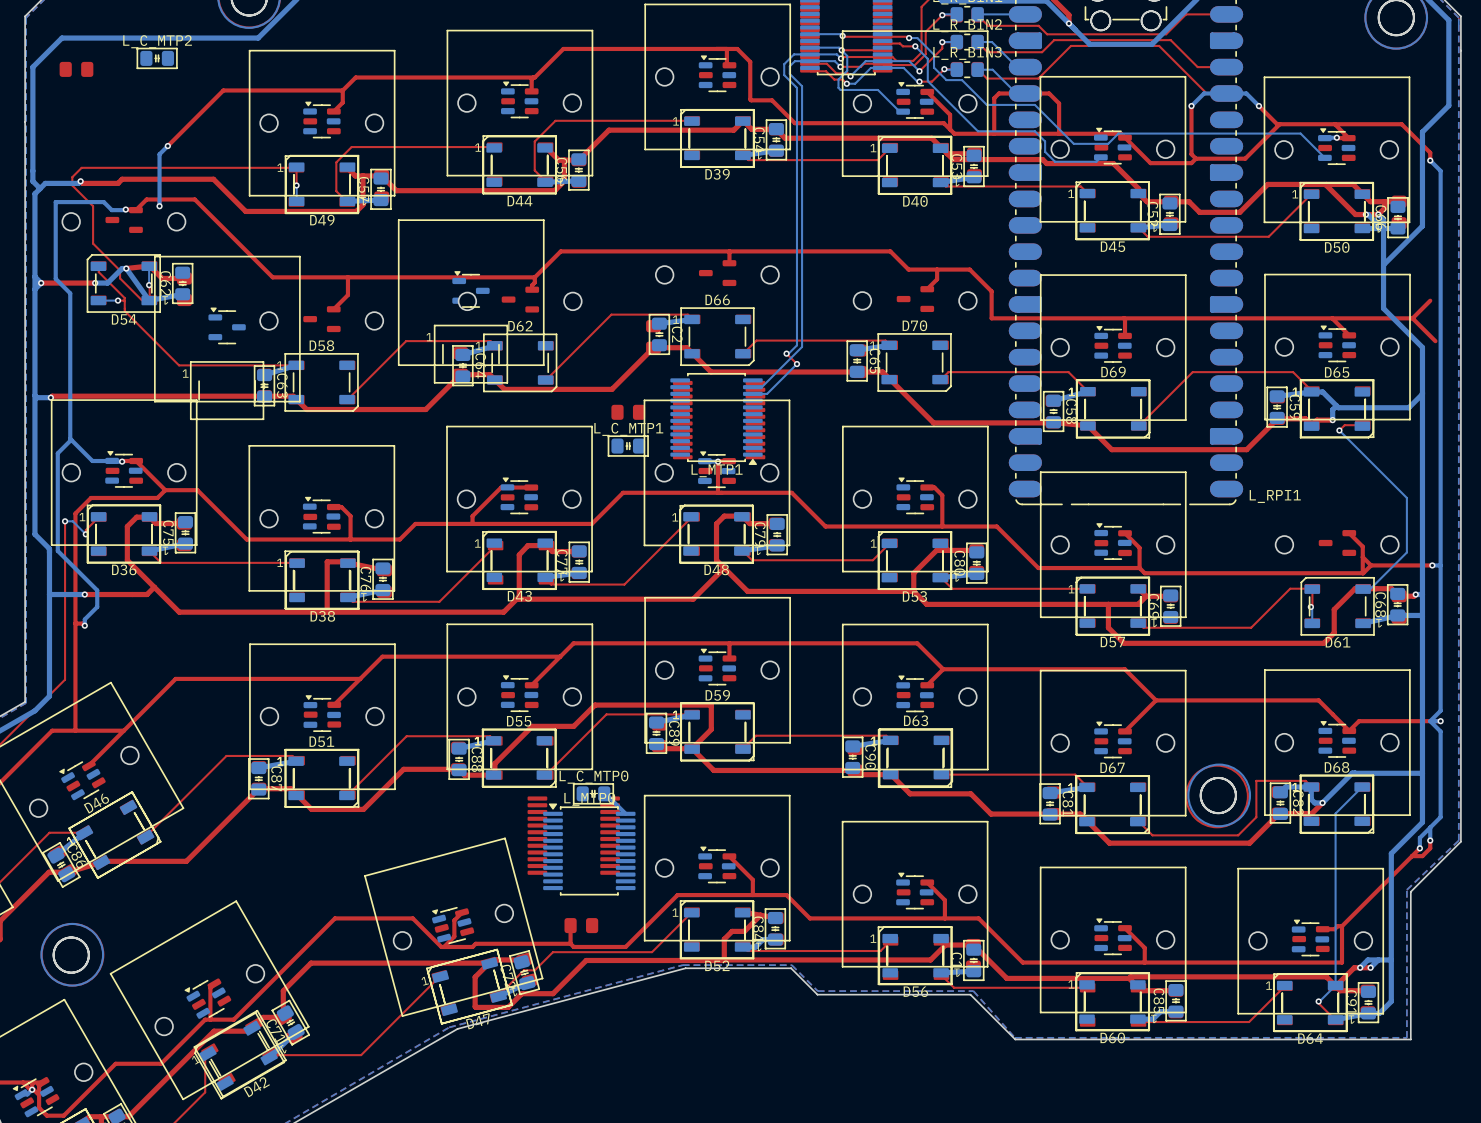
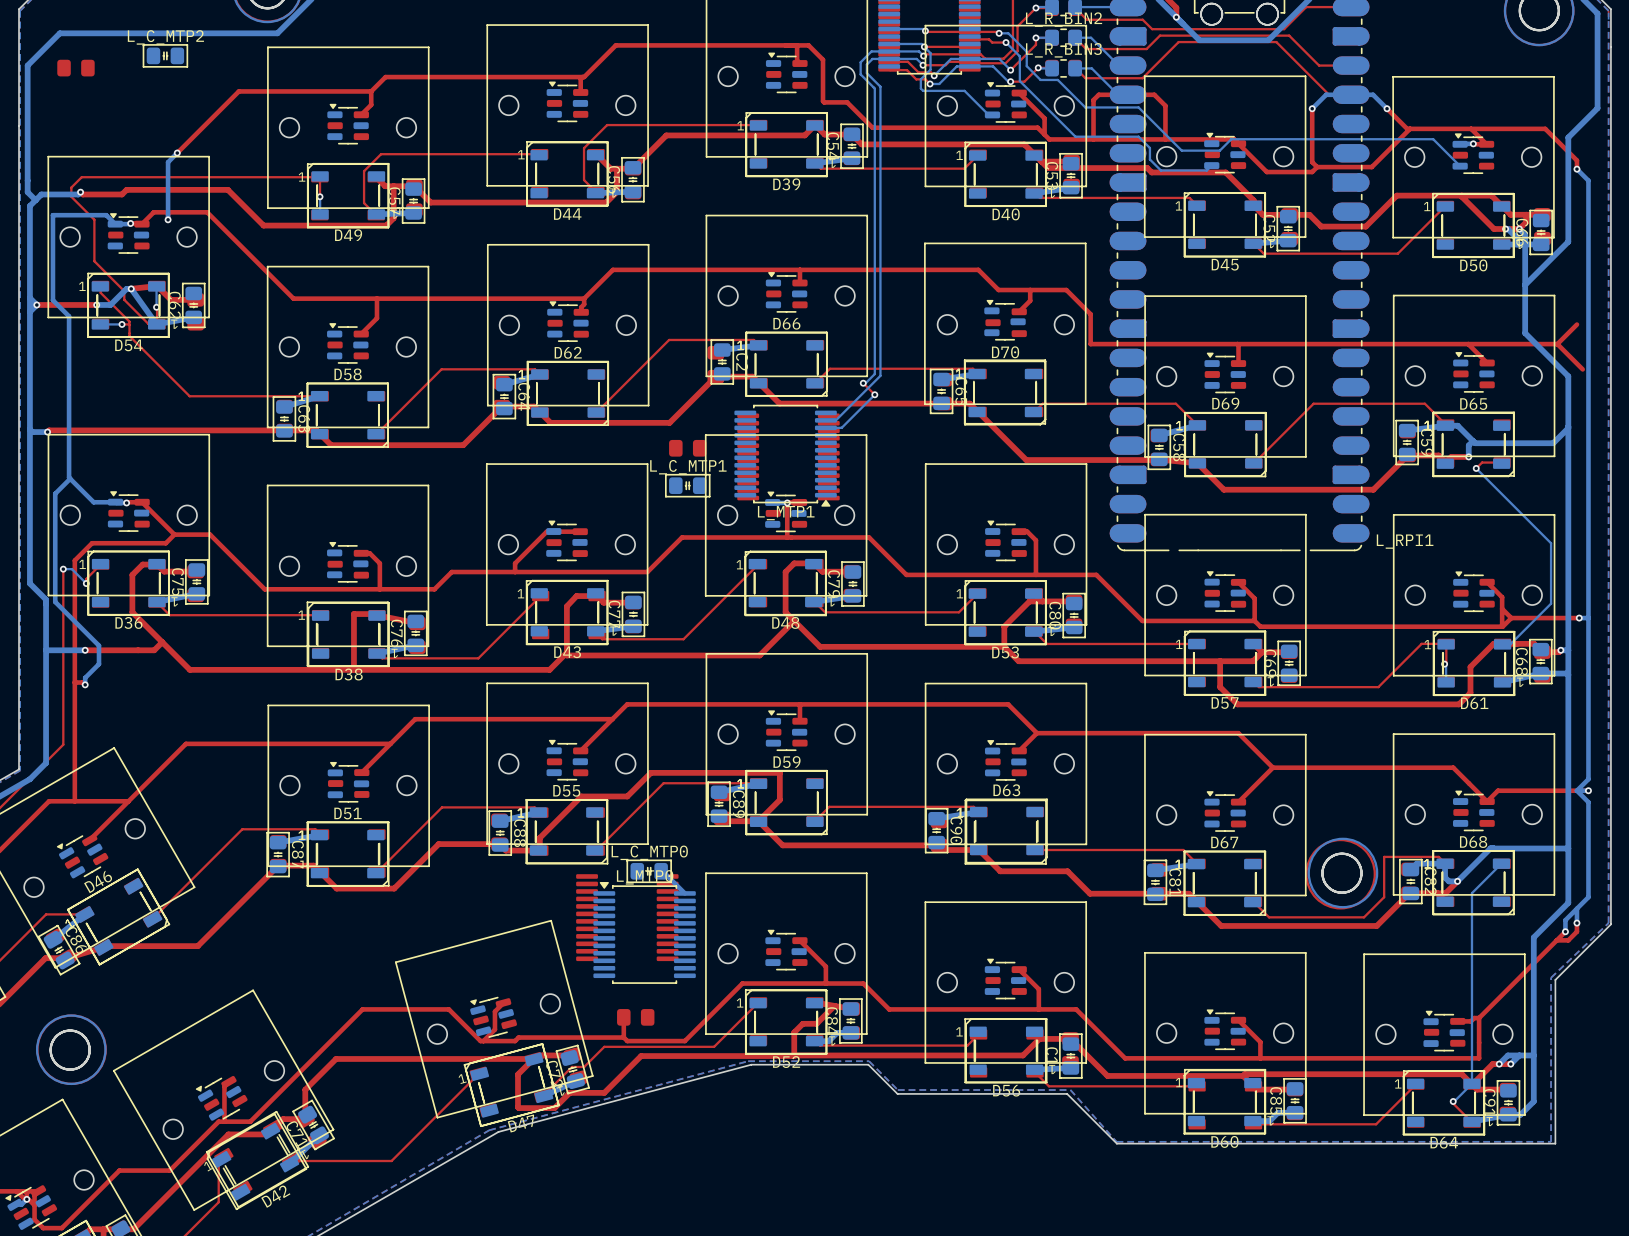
part: none -> (128, 246)
part: none -> (786, 305)
part position: (471, 301) -> (568, 334)
part: none -> (1005, 333)
part: none -> (348, 356)
part: (227, 337) -> none
part: none -> (1474, 605)

